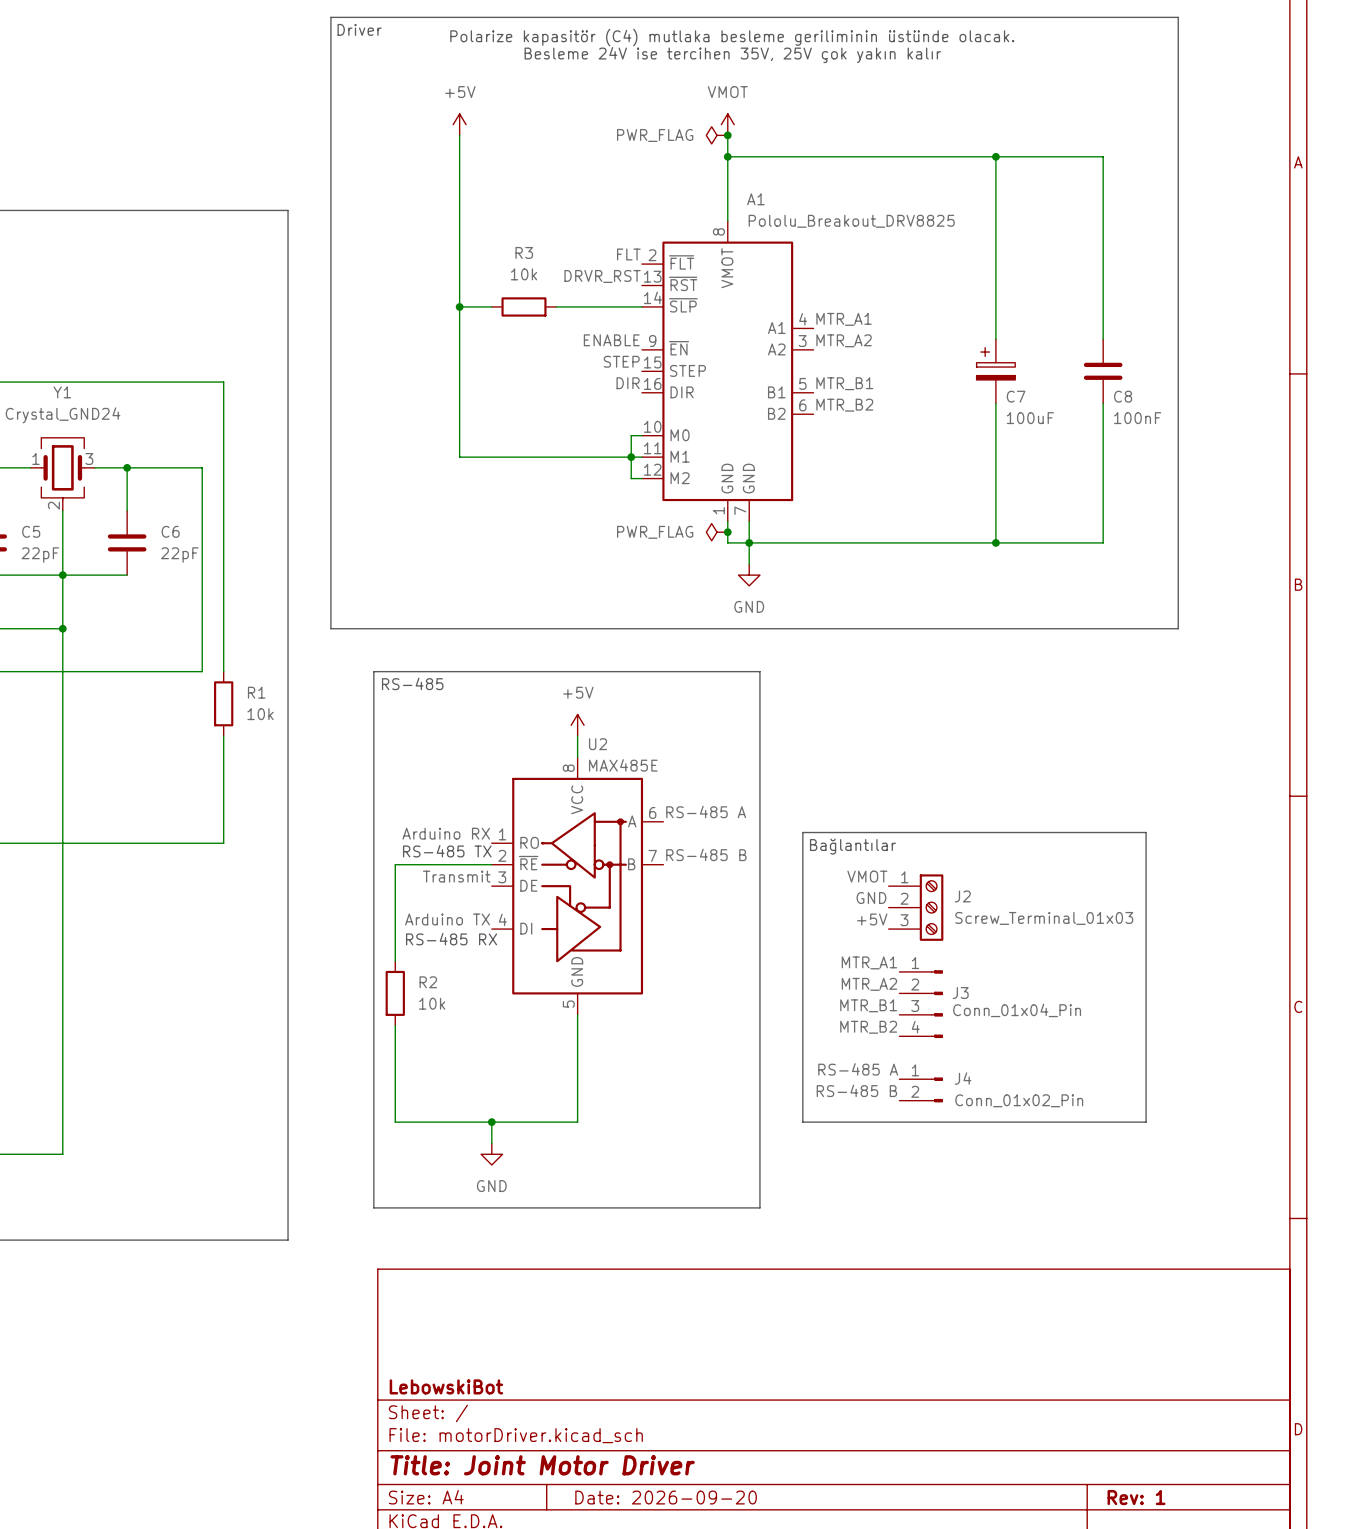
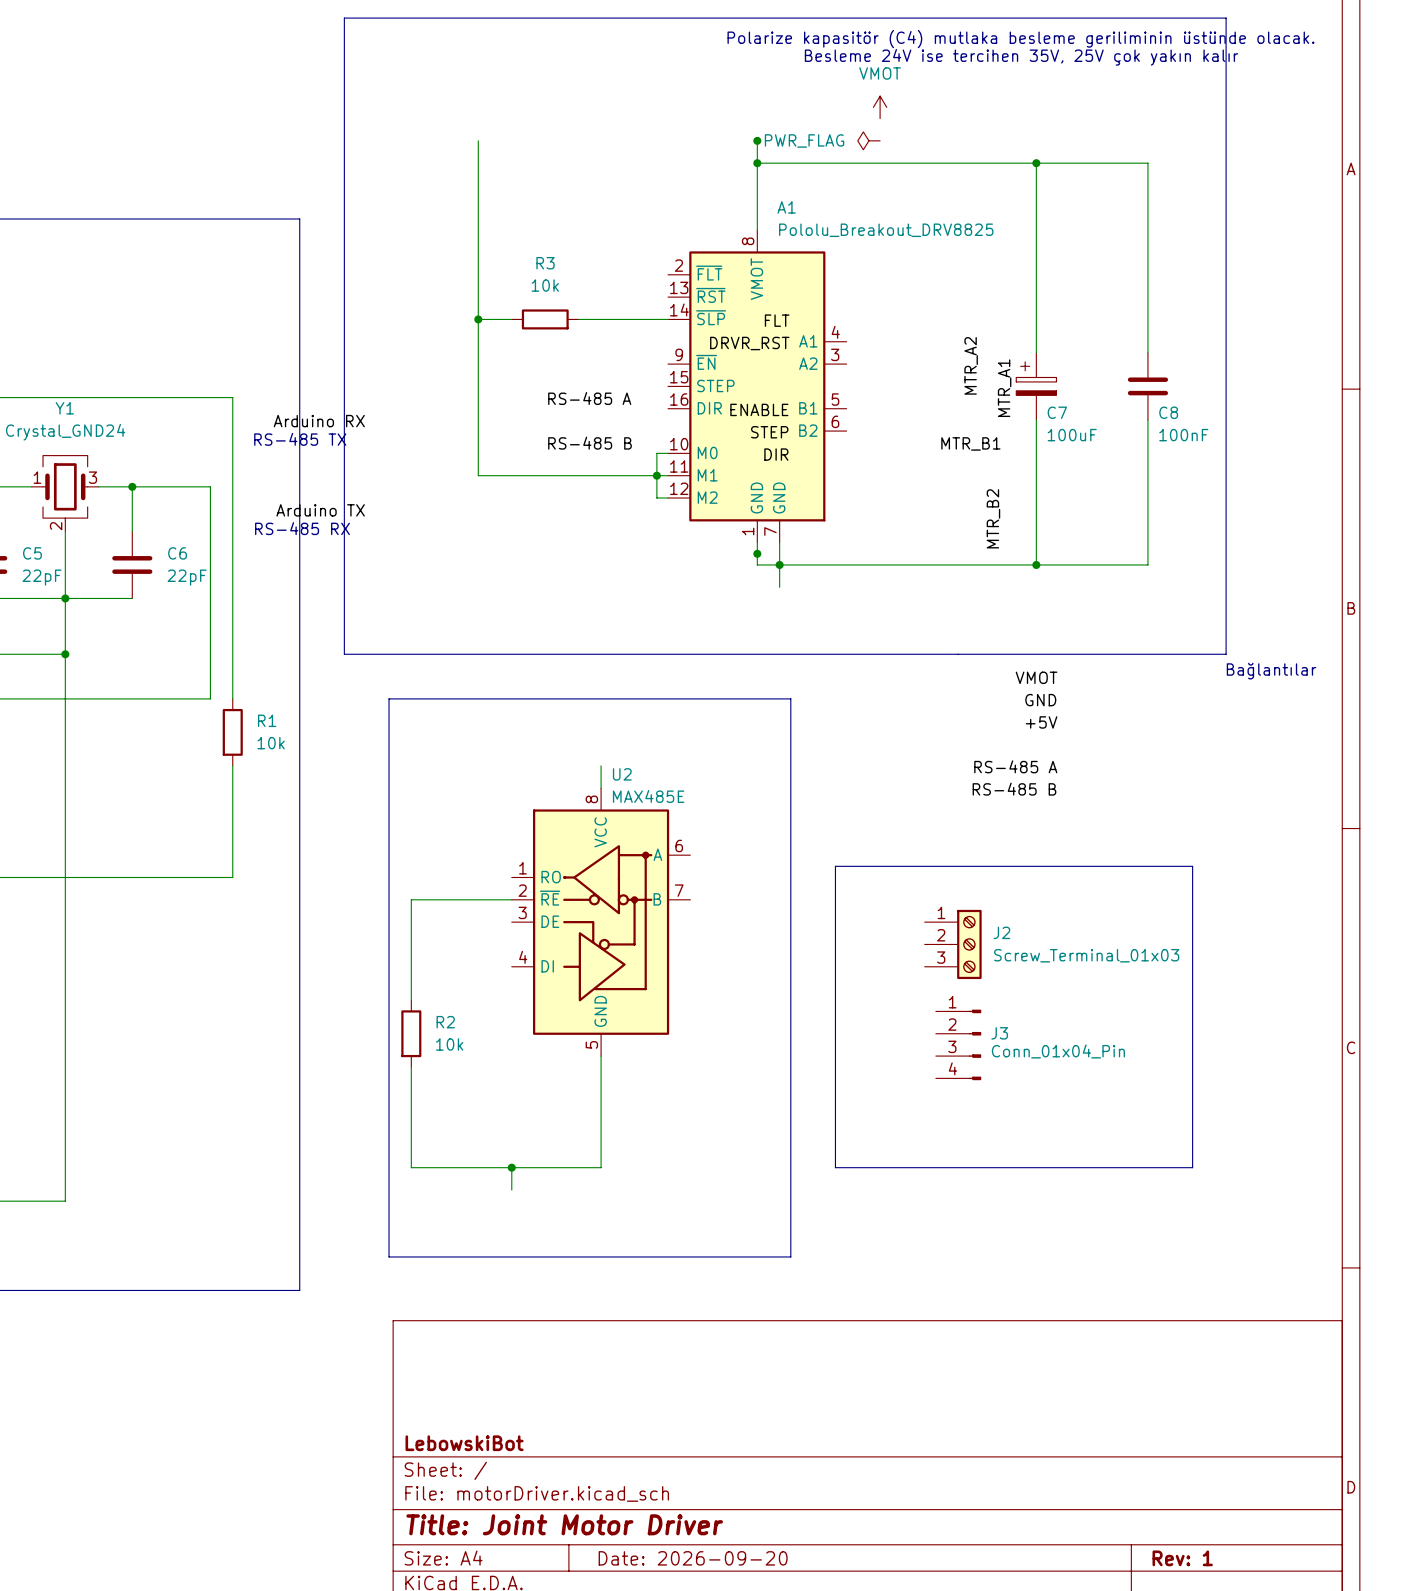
text: Driver (359, 29) -> none
text: Polarize kapasitör (C4) mutlaka besleme geriliminin üstünde olacak. (732, 37) -> none
text: none -> Polarize kapasitör (C4) mutlaka besleme geriliminin üstünde olacak. (1020, 39)
text: Besleme 24V ise tercihen 35V, 25V çok yakın kalır (732, 55) -> none
text: none -> Besleme 24V ise tercihen 35V, 25V çok yakın kalır (1021, 57)
power symbol: +5V (459, 124) -> none
power symbol position: VMOT (727, 124) -> VMOT (880, 107)
power symbol position: PWR_FLAG (717, 135) -> PWR_FLAG (868, 140)
label position: FLT (628, 254) -> FLT (777, 320)
label position: DRVR_RST (602, 276) -> DRVR_RST (749, 343)
label rotation: 0° (844, 319) -> 90° counterclockwise (1004, 388)
label position: MTR_A1 (844, 319) -> MTR_A1 (1004, 388)
label position: ENABLE (611, 340) -> ENABLE (759, 409)
label rotation: 0° (844, 340) -> 90° counterclockwise (971, 365)
label position: MTR_A2 (844, 340) -> MTR_A2 (971, 365)
label position: STEP (621, 361) -> STEP (769, 432)
label: none -> RS-485 A (589, 398)
label position: DIR (628, 383) -> DIR (776, 454)
label position: MTR_B1 (844, 383) -> MTR_B1 (970, 443)
label: none -> Arduino RX (319, 421)
label rotation: 0° (844, 405) -> 90° counterclockwise (993, 518)
label position: MTR_B2 (844, 405) -> MTR_B2 (993, 518)
text: none -> RS-485 TX (300, 439)
label: none -> RS-485 B (589, 443)
label: none -> Arduino TX (320, 510)
text: none -> RS-485 RX (302, 528)
power symbol: PWR_FLAG (717, 532) -> none
power symbol: GND (749, 575) -> none
text: none -> Bağlantılar (1271, 671)
label: none -> VMOT (1036, 677)
label: none -> GND (1040, 700)
text: RS-485 (412, 683) -> none
label: none -> +5V (1041, 722)
power symbol: +5V (577, 725) -> none
label: none -> RS-485 A (1015, 766)
label: none -> RS-485 B (1014, 789)
label: RS-485 A (706, 811) -> none
label: Arduino RX (446, 833) -> none
text: Bağlantılar (852, 846) -> none
text: RS-485 TX (447, 851) -> none
label: RS-485 B (706, 854) -> none
label: Transmit (456, 876) -> none
label: VMOT (867, 876) -> none
label: GND (871, 898) -> none
label: Arduino TX (447, 919) -> none
label: +5V (872, 919) -> none
text: RS-485 RX (451, 939) -> none
label: MTR_A1 (869, 962) -> none
label: MTR_A2 (869, 984) -> none
label: MTR_B1 (868, 1005) -> none
label: MTR_B2 (868, 1027) -> none
label: RS-485 A (858, 1069) -> none
J4: Conn_01x02_Pin (921, 1089) -> none
label: RS-485 B (856, 1090) -> none
power symbol: GND (491, 1154) -> none

